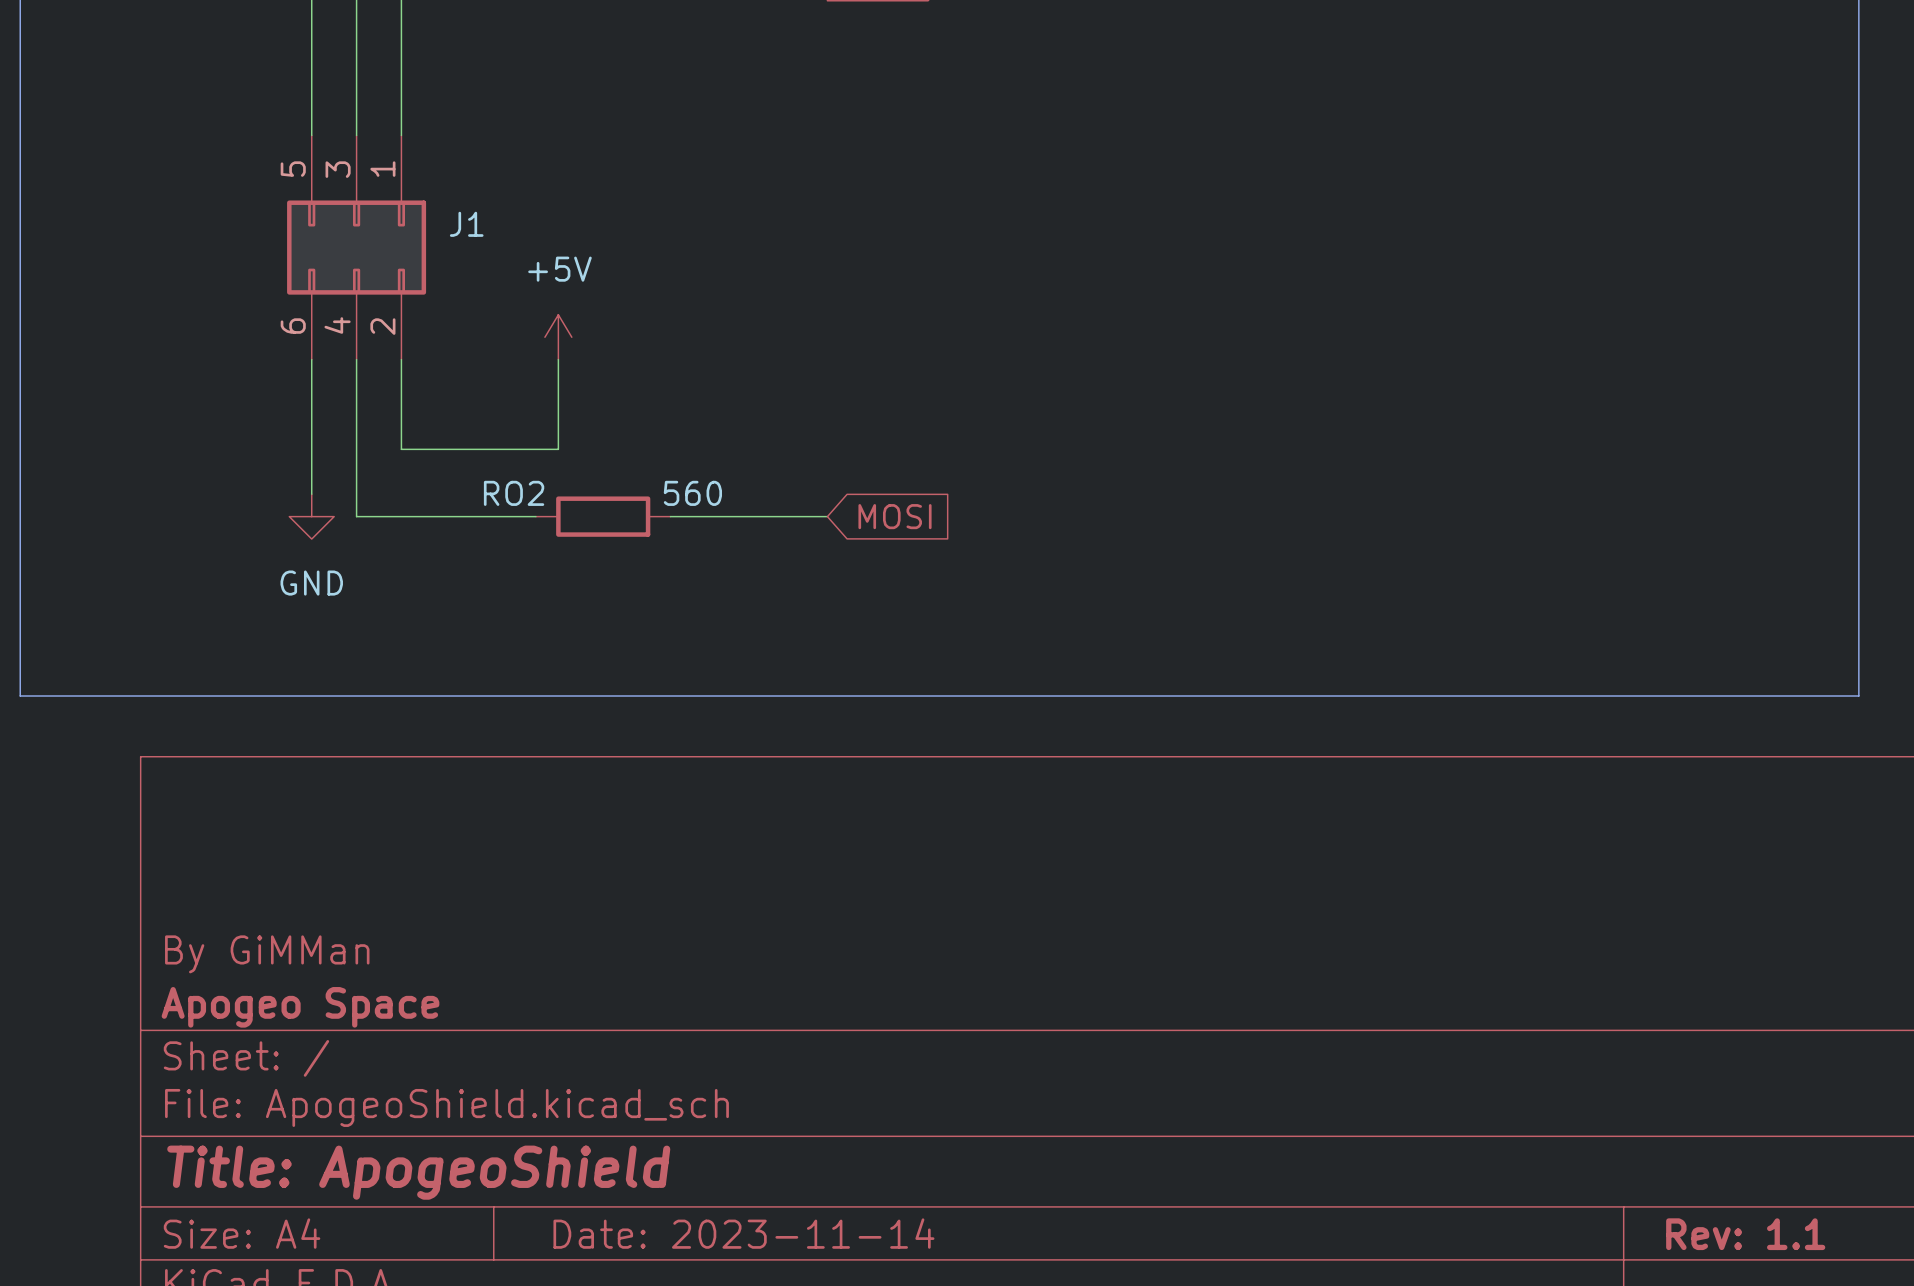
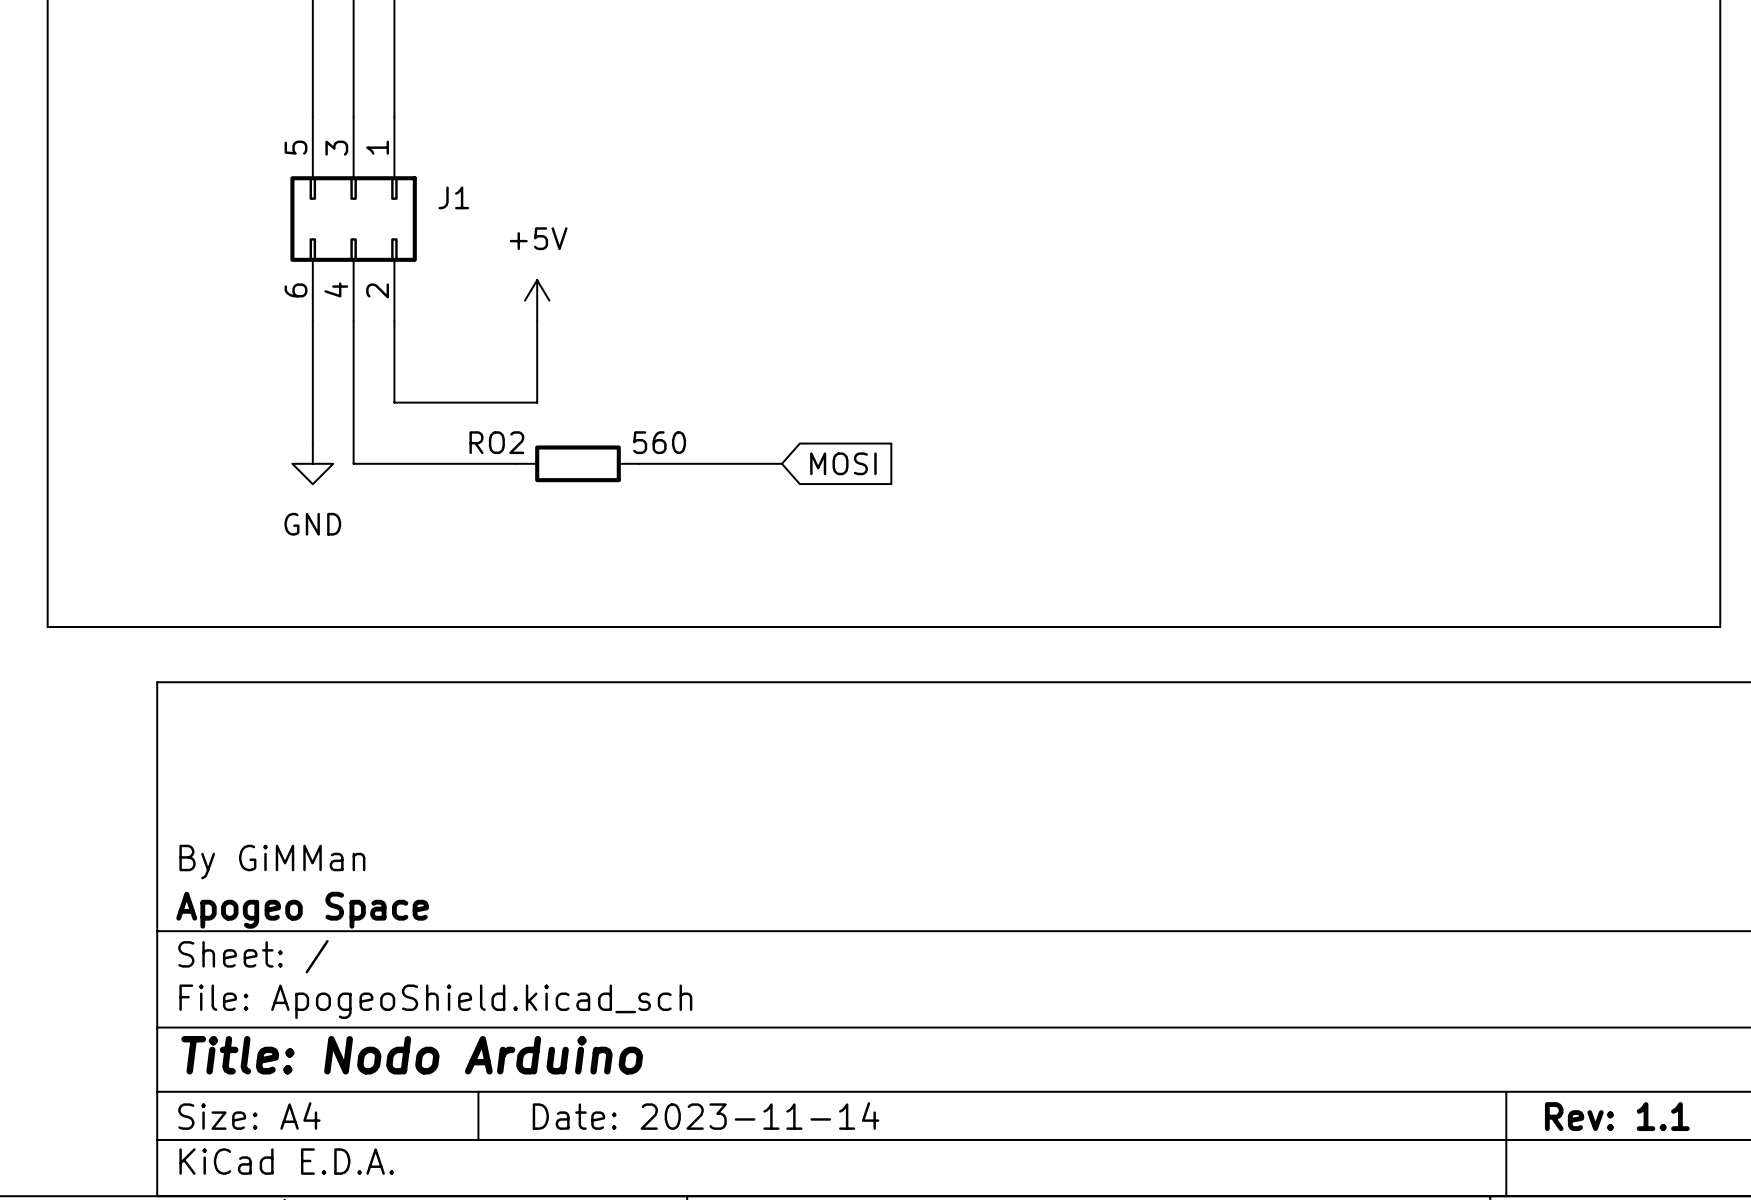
title block: Title: ApogeoShield (418, 1172) -> Title: Nodo Arduino (412, 1055)

